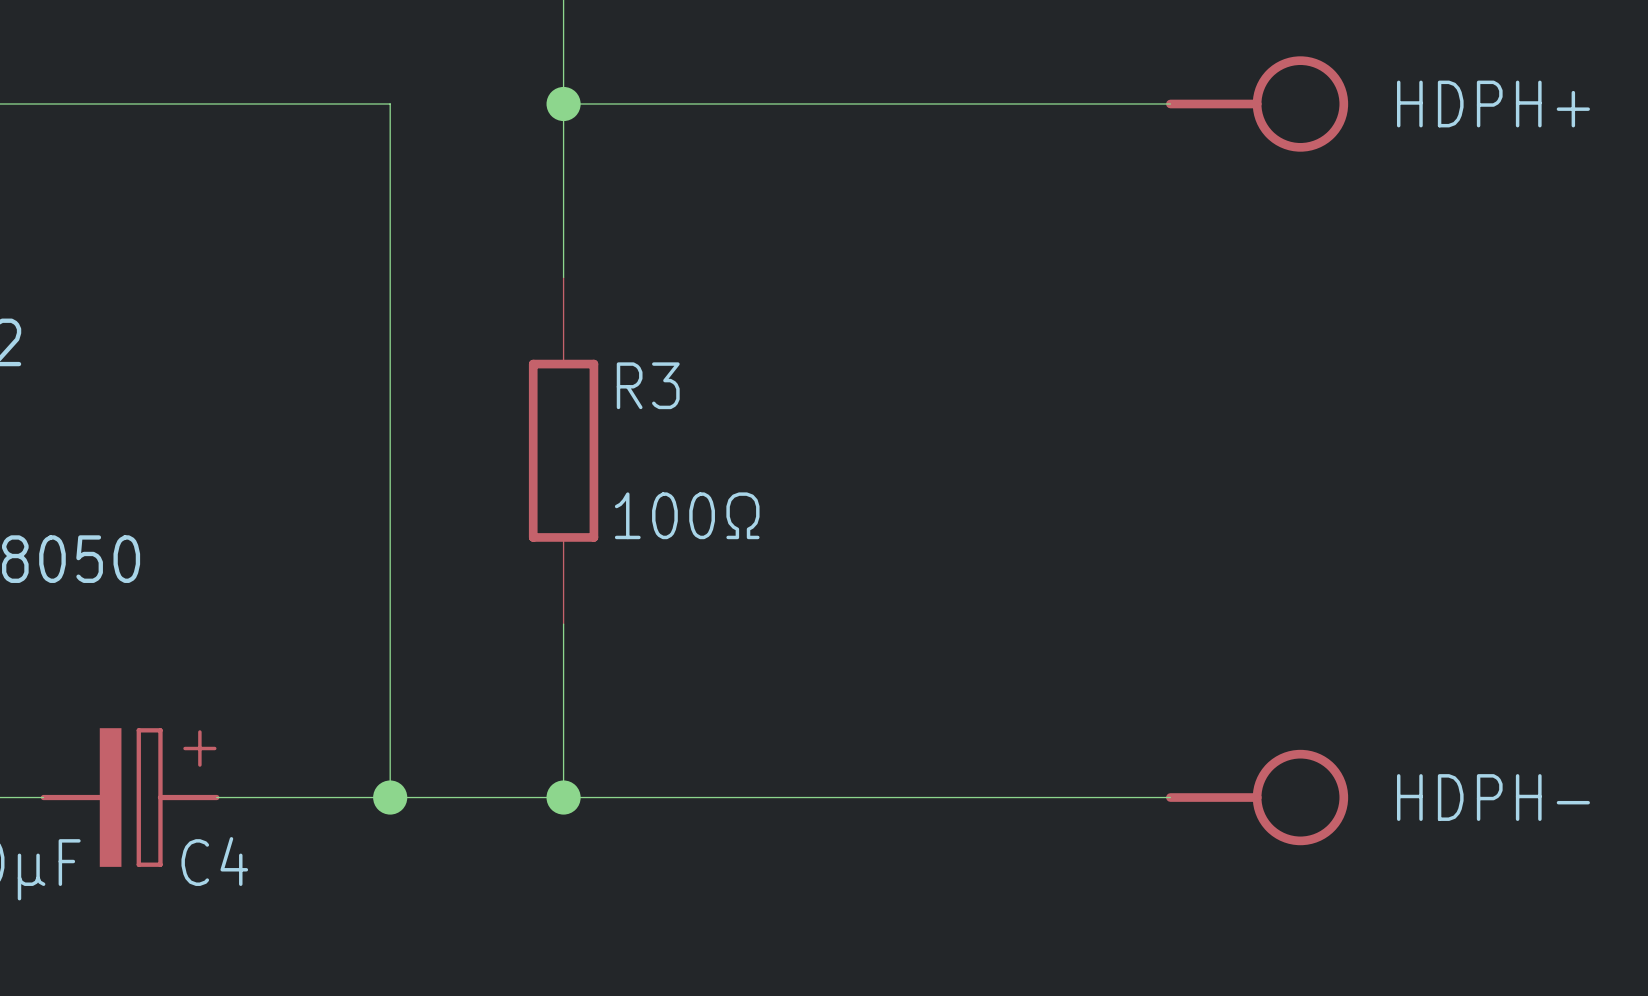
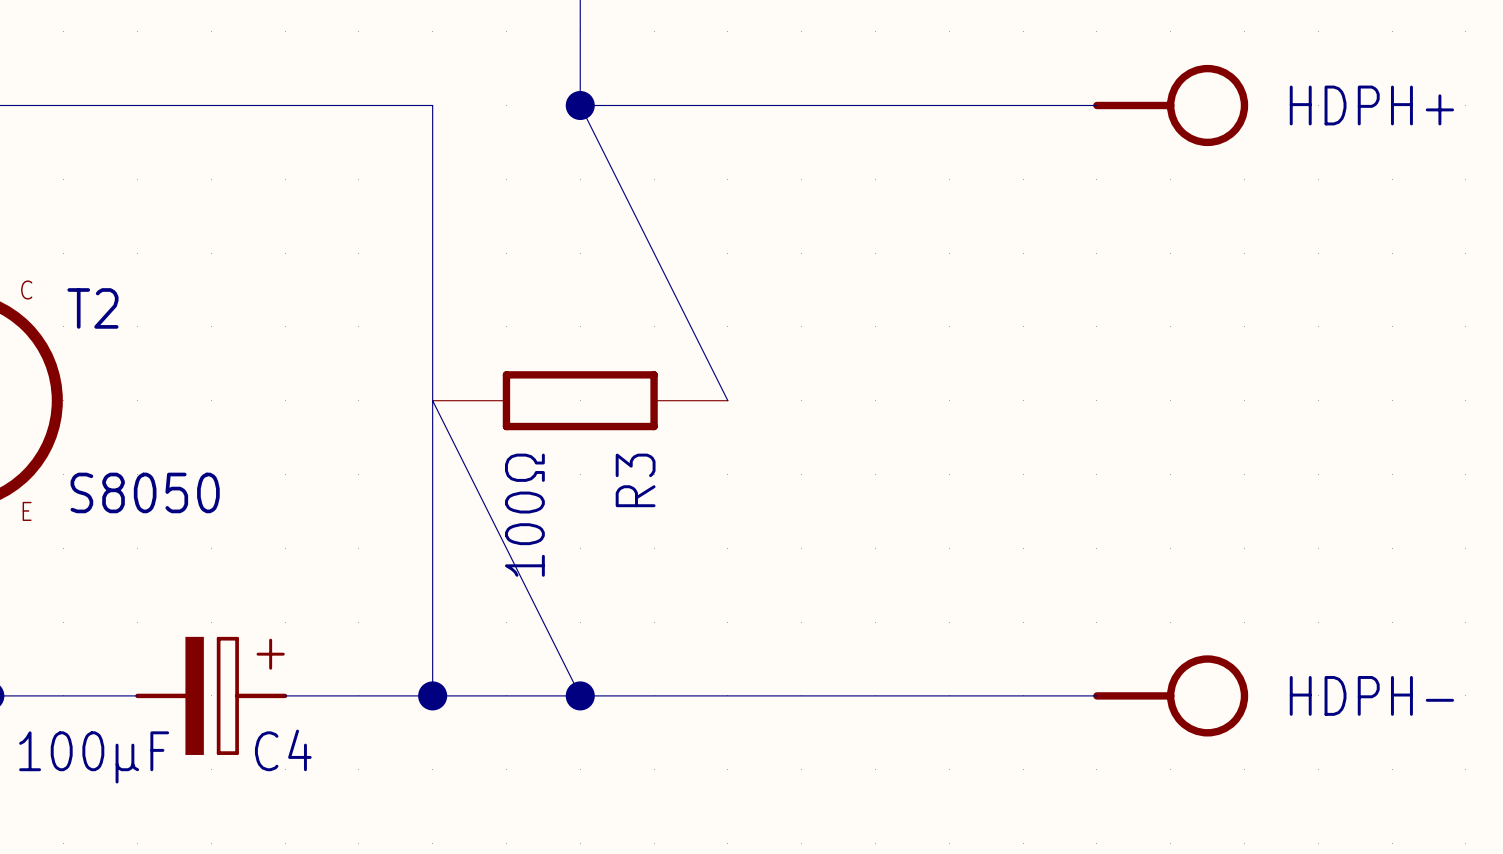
wire: (563, 104) (563, 277) -> (580, 105) (727, 400)
R3 rotation: 0° (563, 450) -> 90° clockwise (580, 400)
wire: (563, 624) (563, 797) -> (432, 400) (580, 695)

